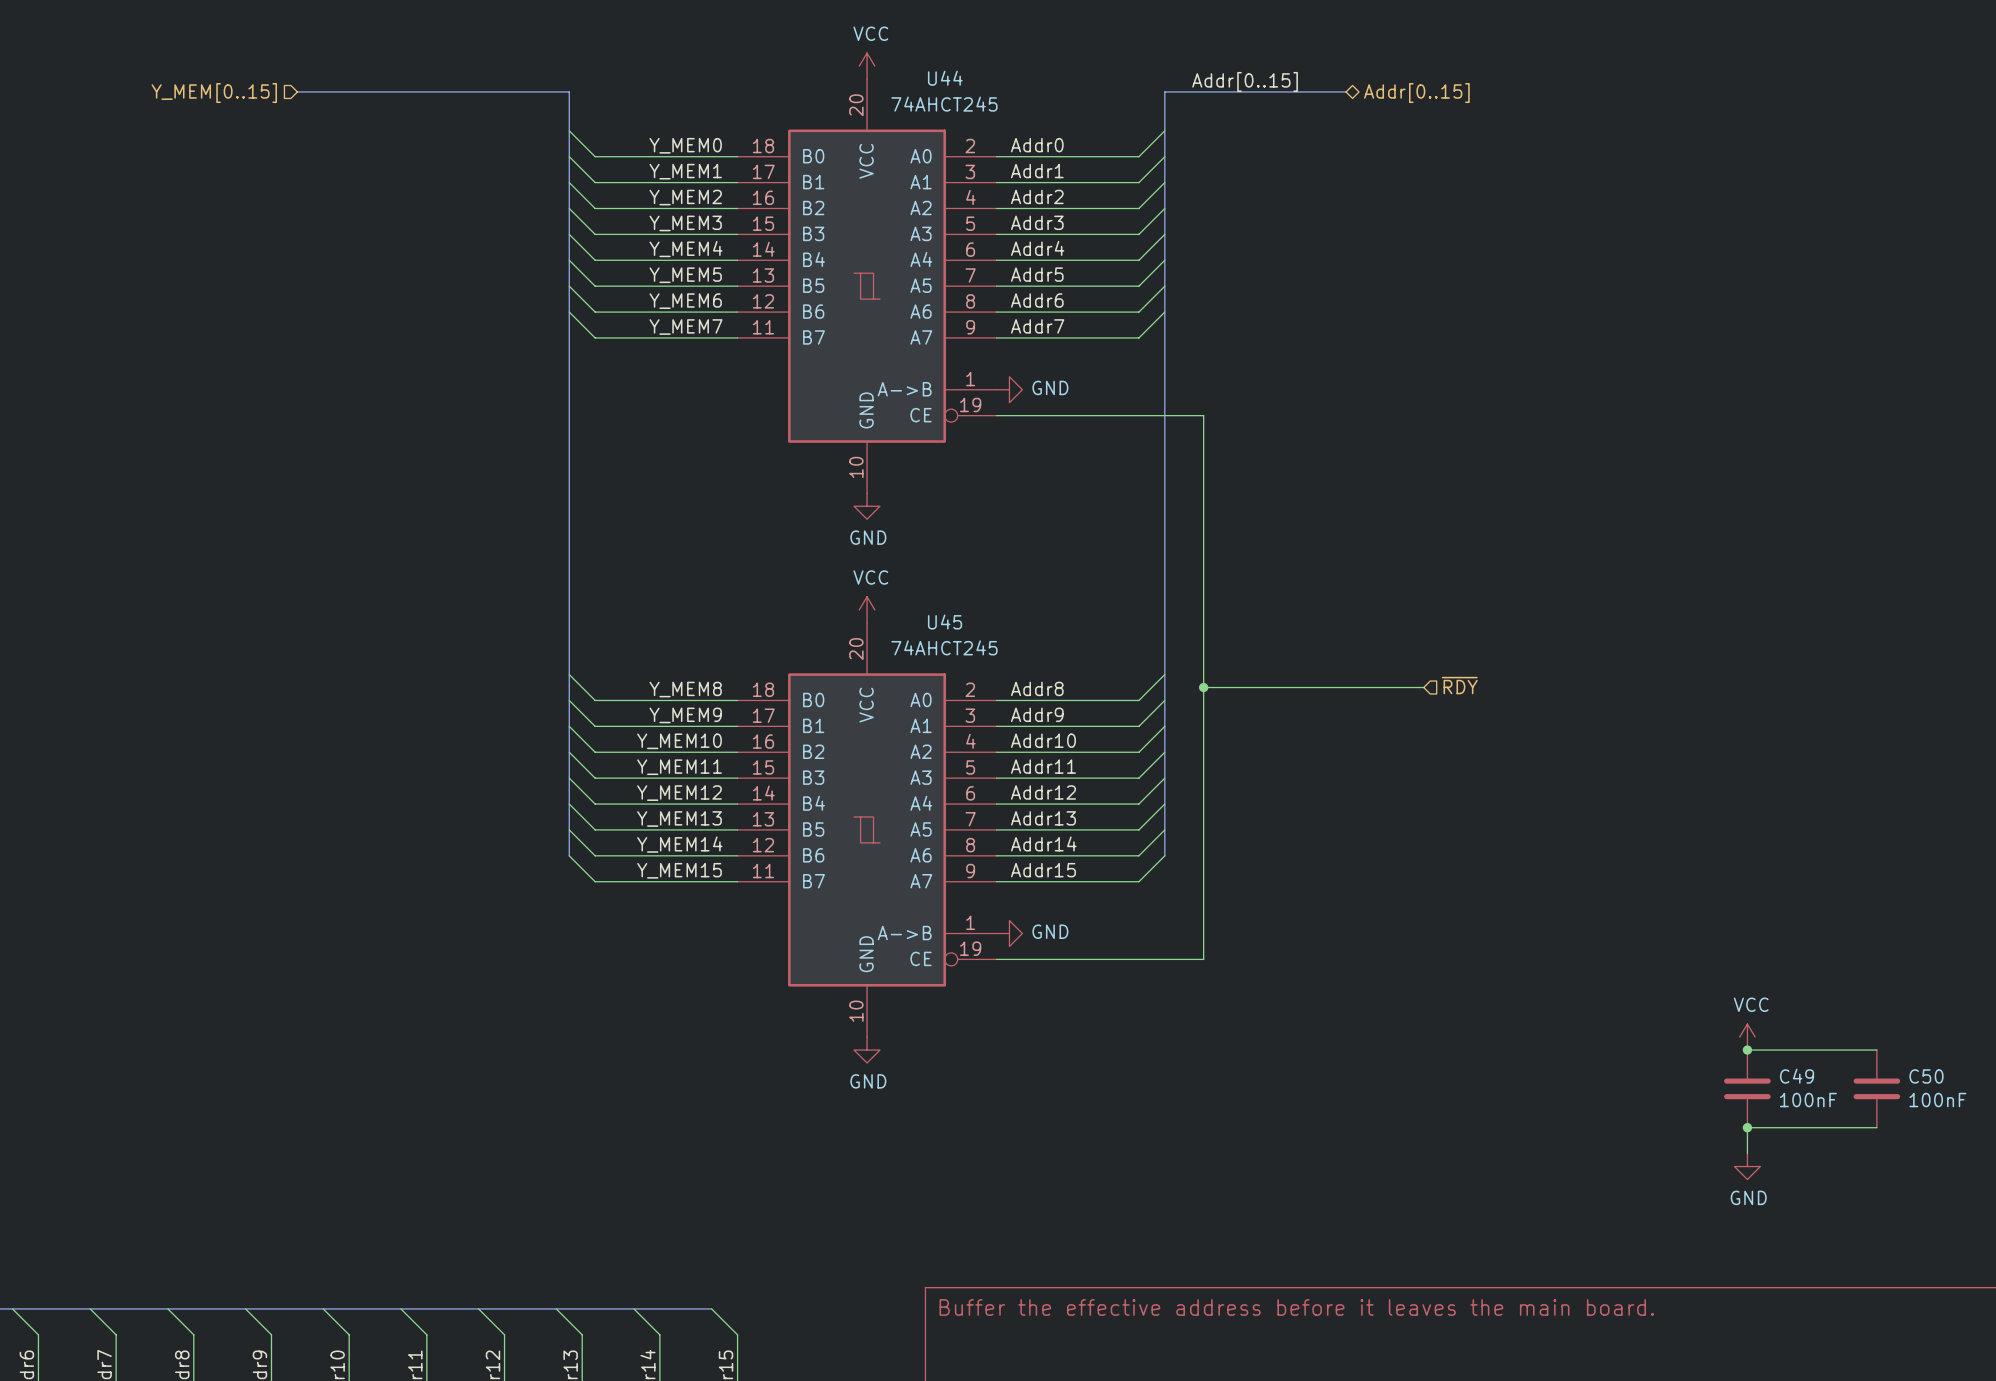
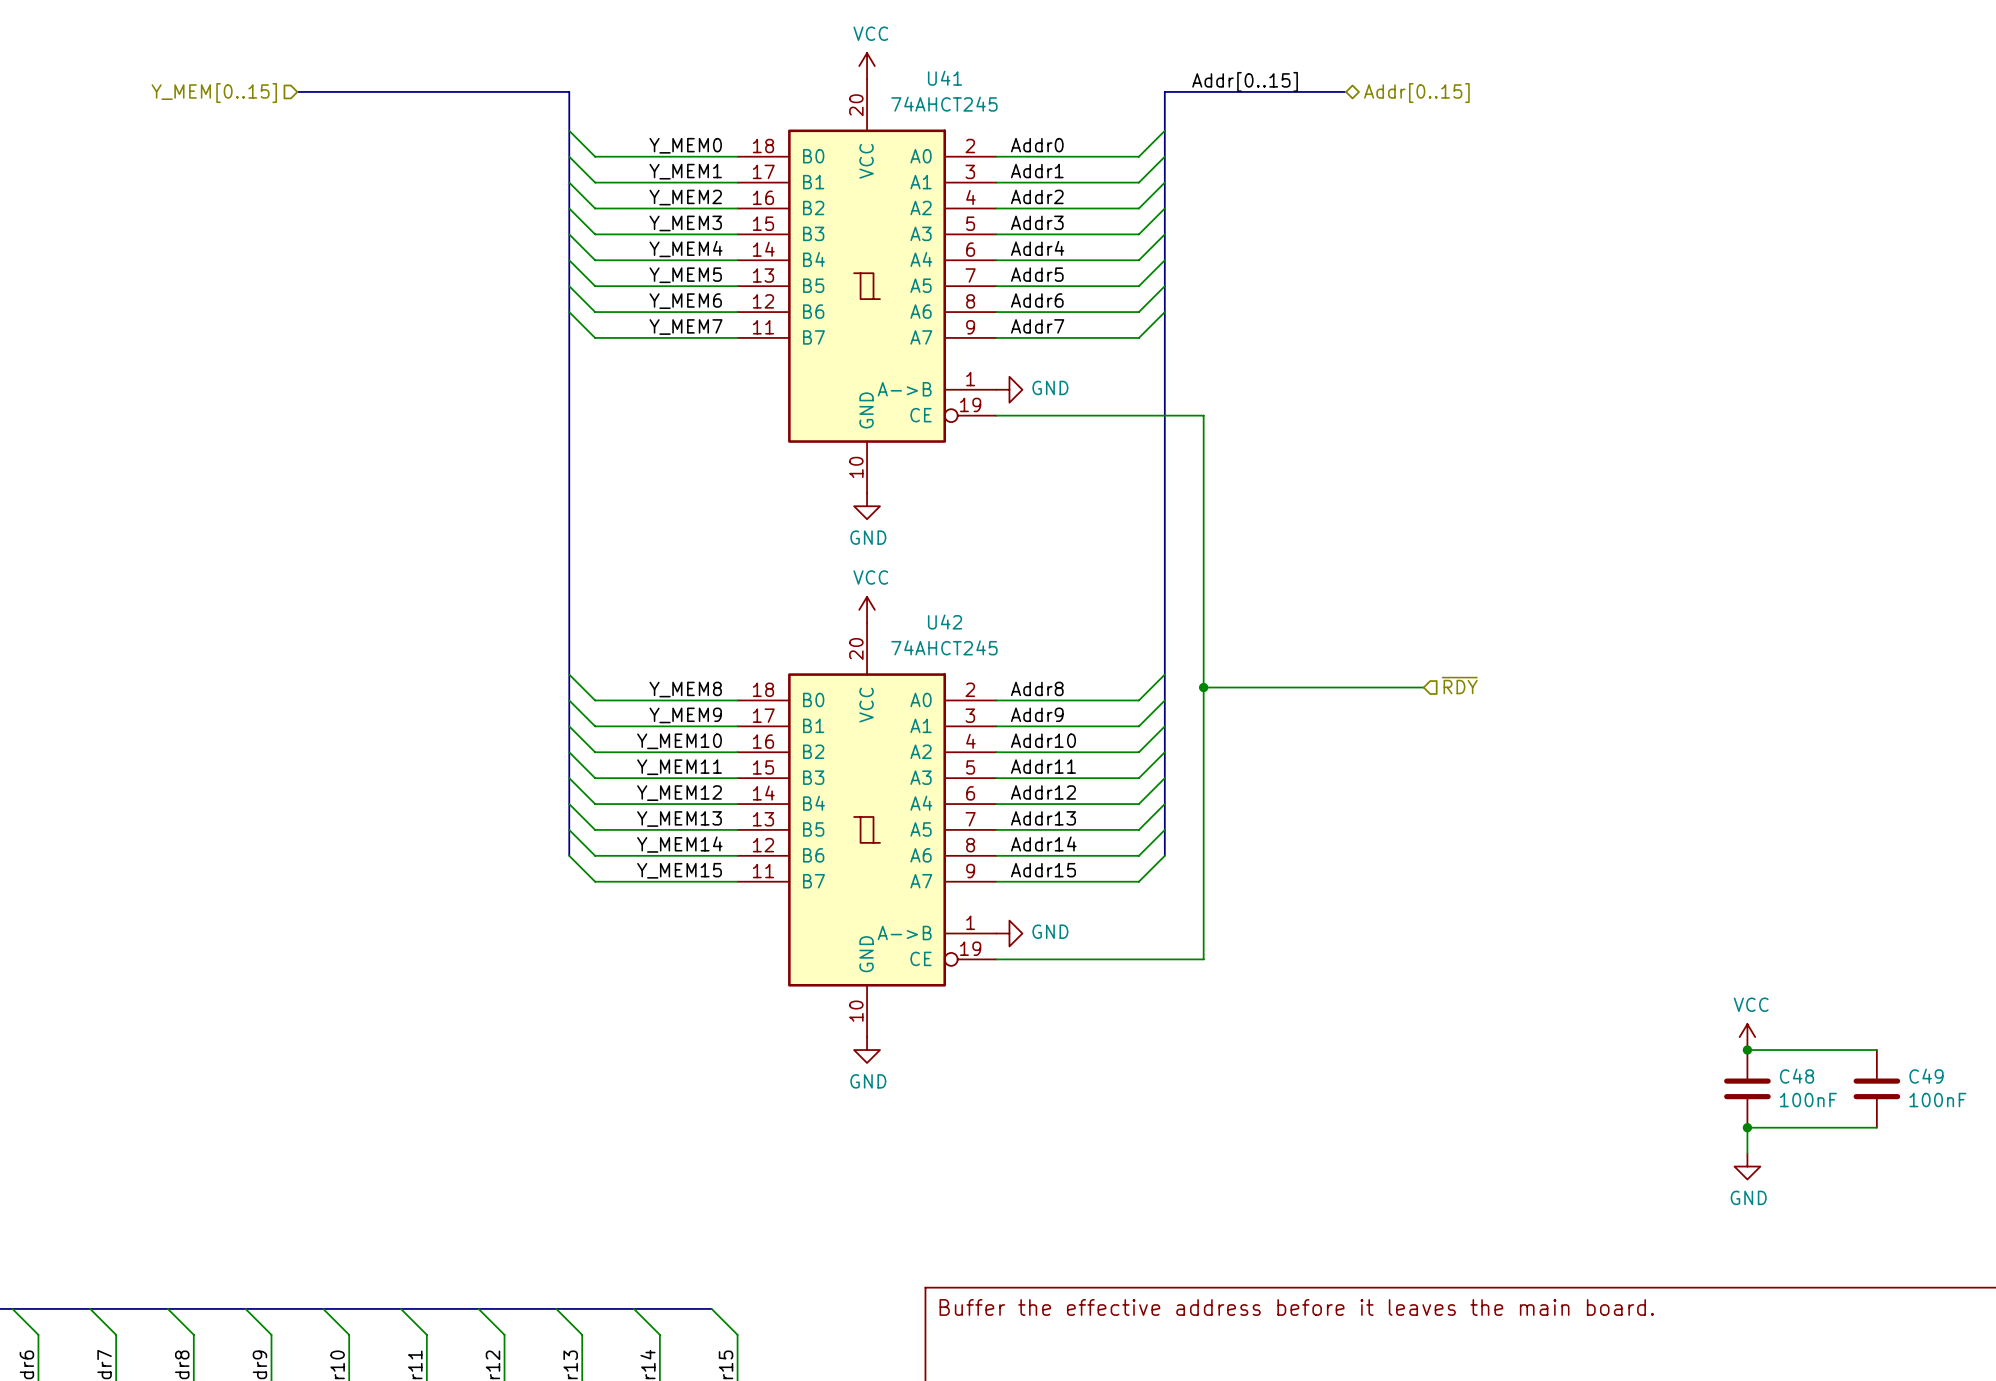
U44 name: U44 (945, 78) -> U41 (945, 78)
U45 name: U45 (945, 621) -> U42 (945, 621)
C49 name: C49 (1797, 1076) -> C48 (1797, 1076)
C50 name: C50 (1926, 1076) -> C49 (1926, 1076)

